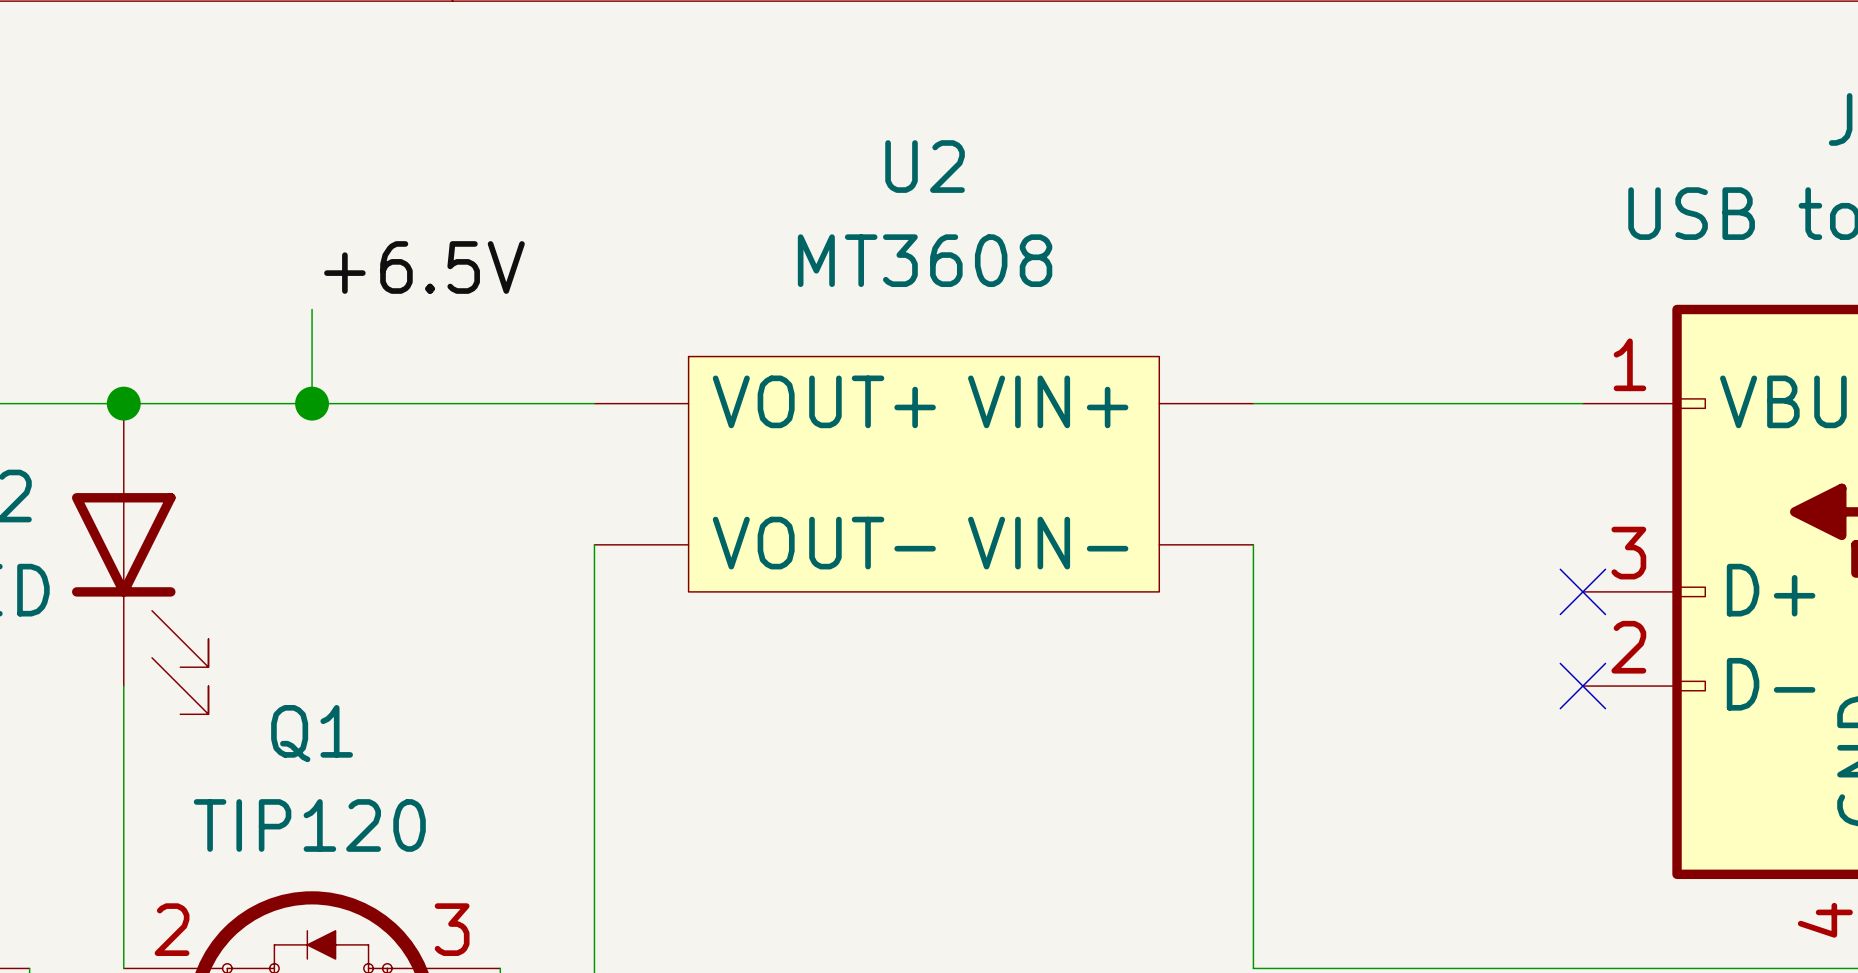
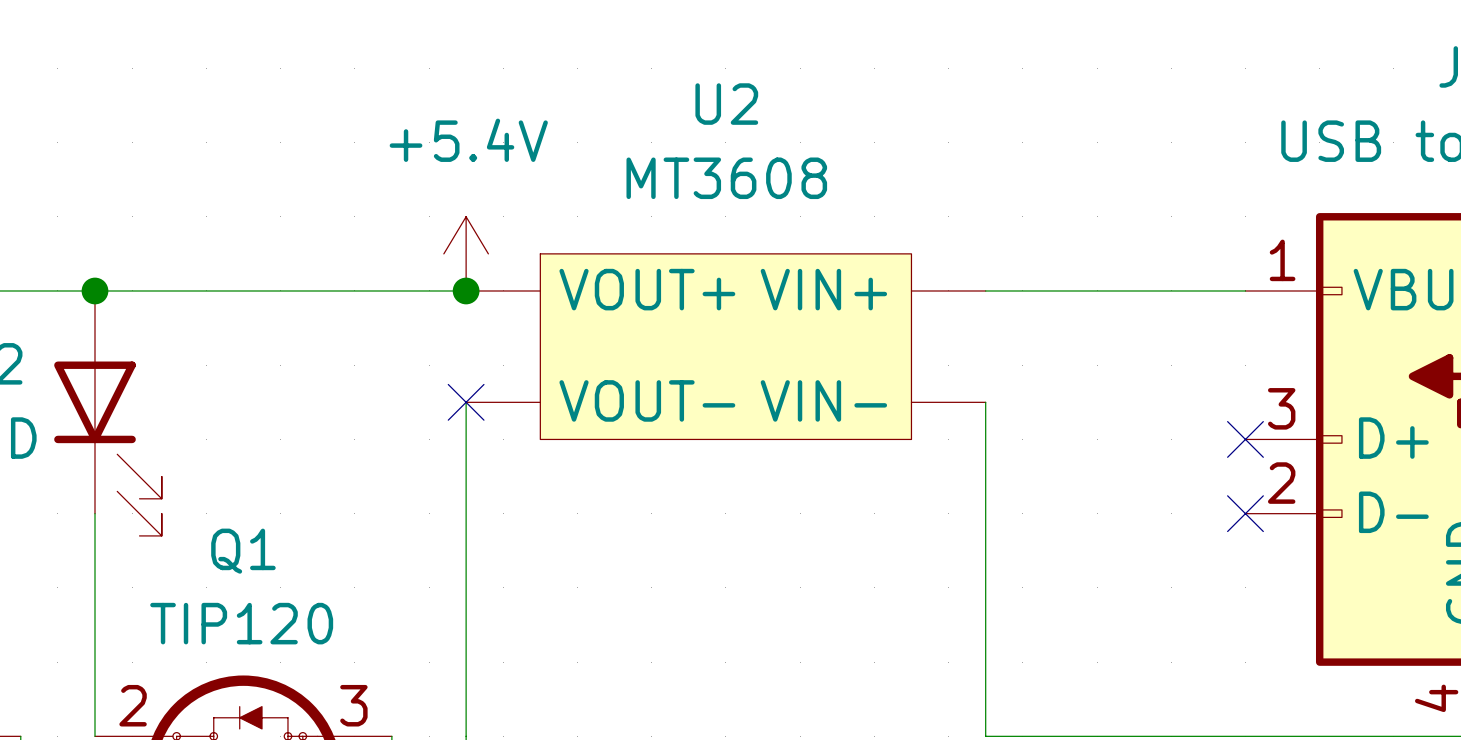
label: +6.5V (424, 267) -> none
wire: (312, 309) (312, 403) -> none
power symbol: none -> +5.4V (466, 253)
junction: (312, 403) -> none
junction: none -> (466, 290)
no-connect mark: none -> (466, 402)

